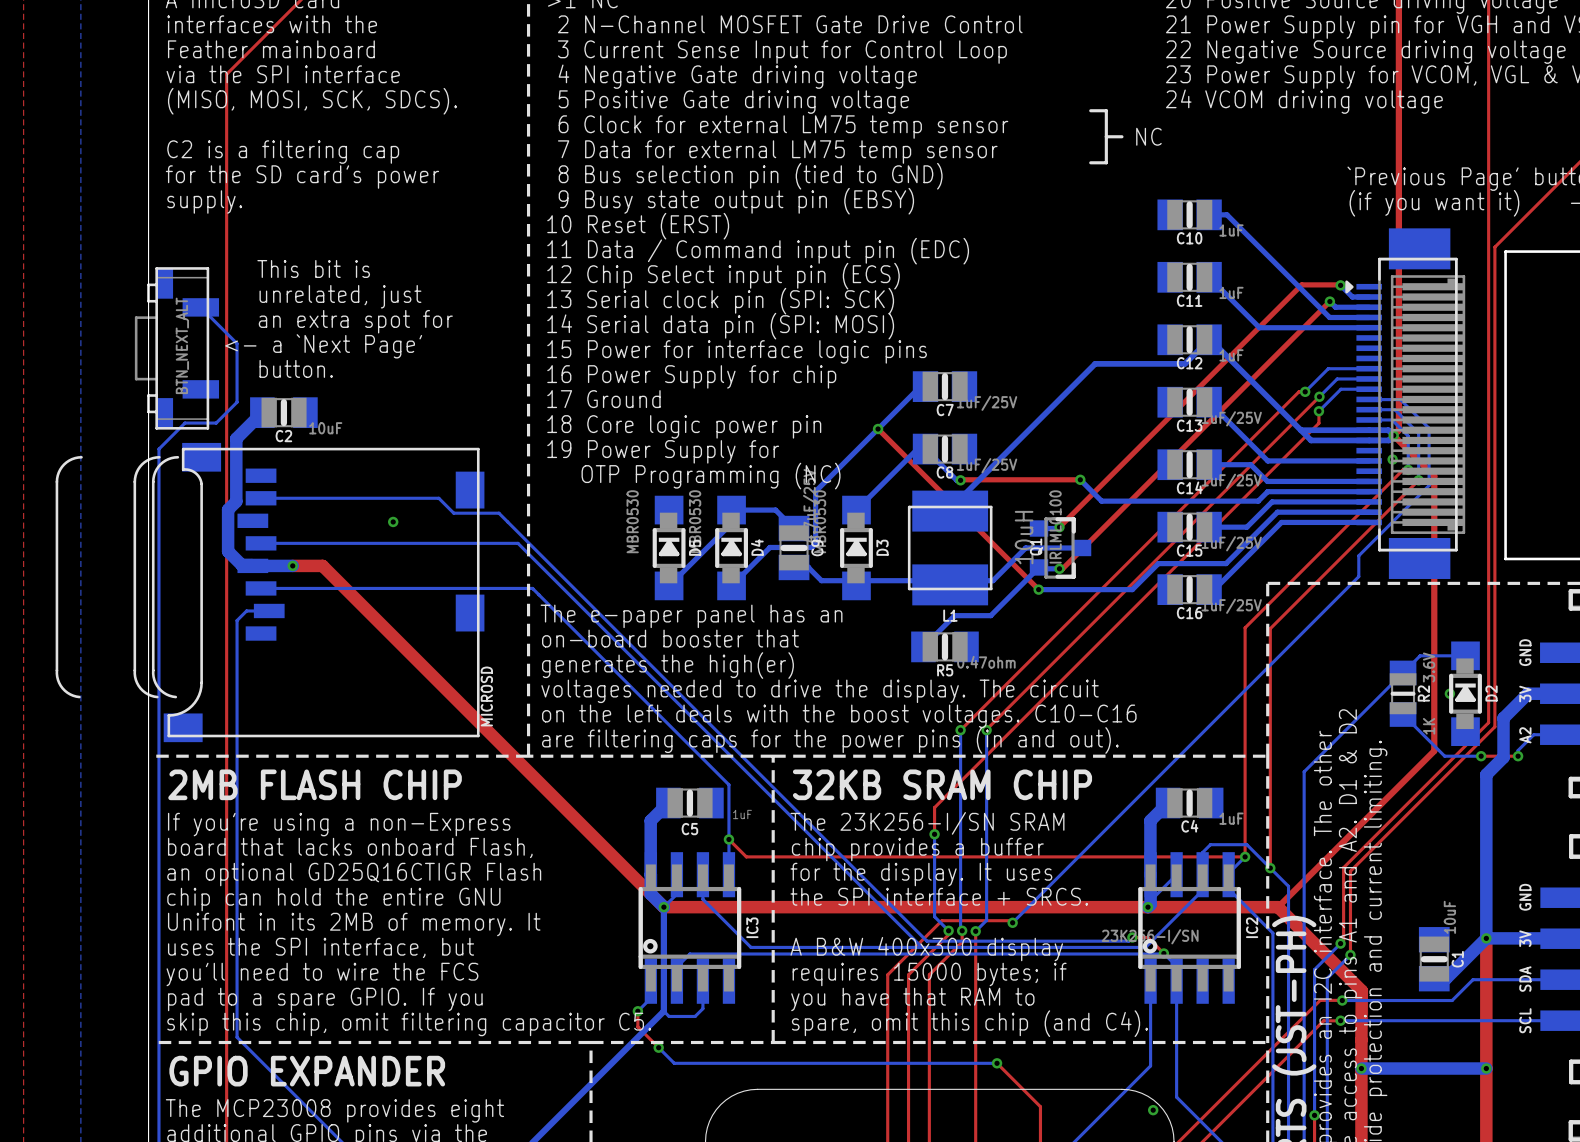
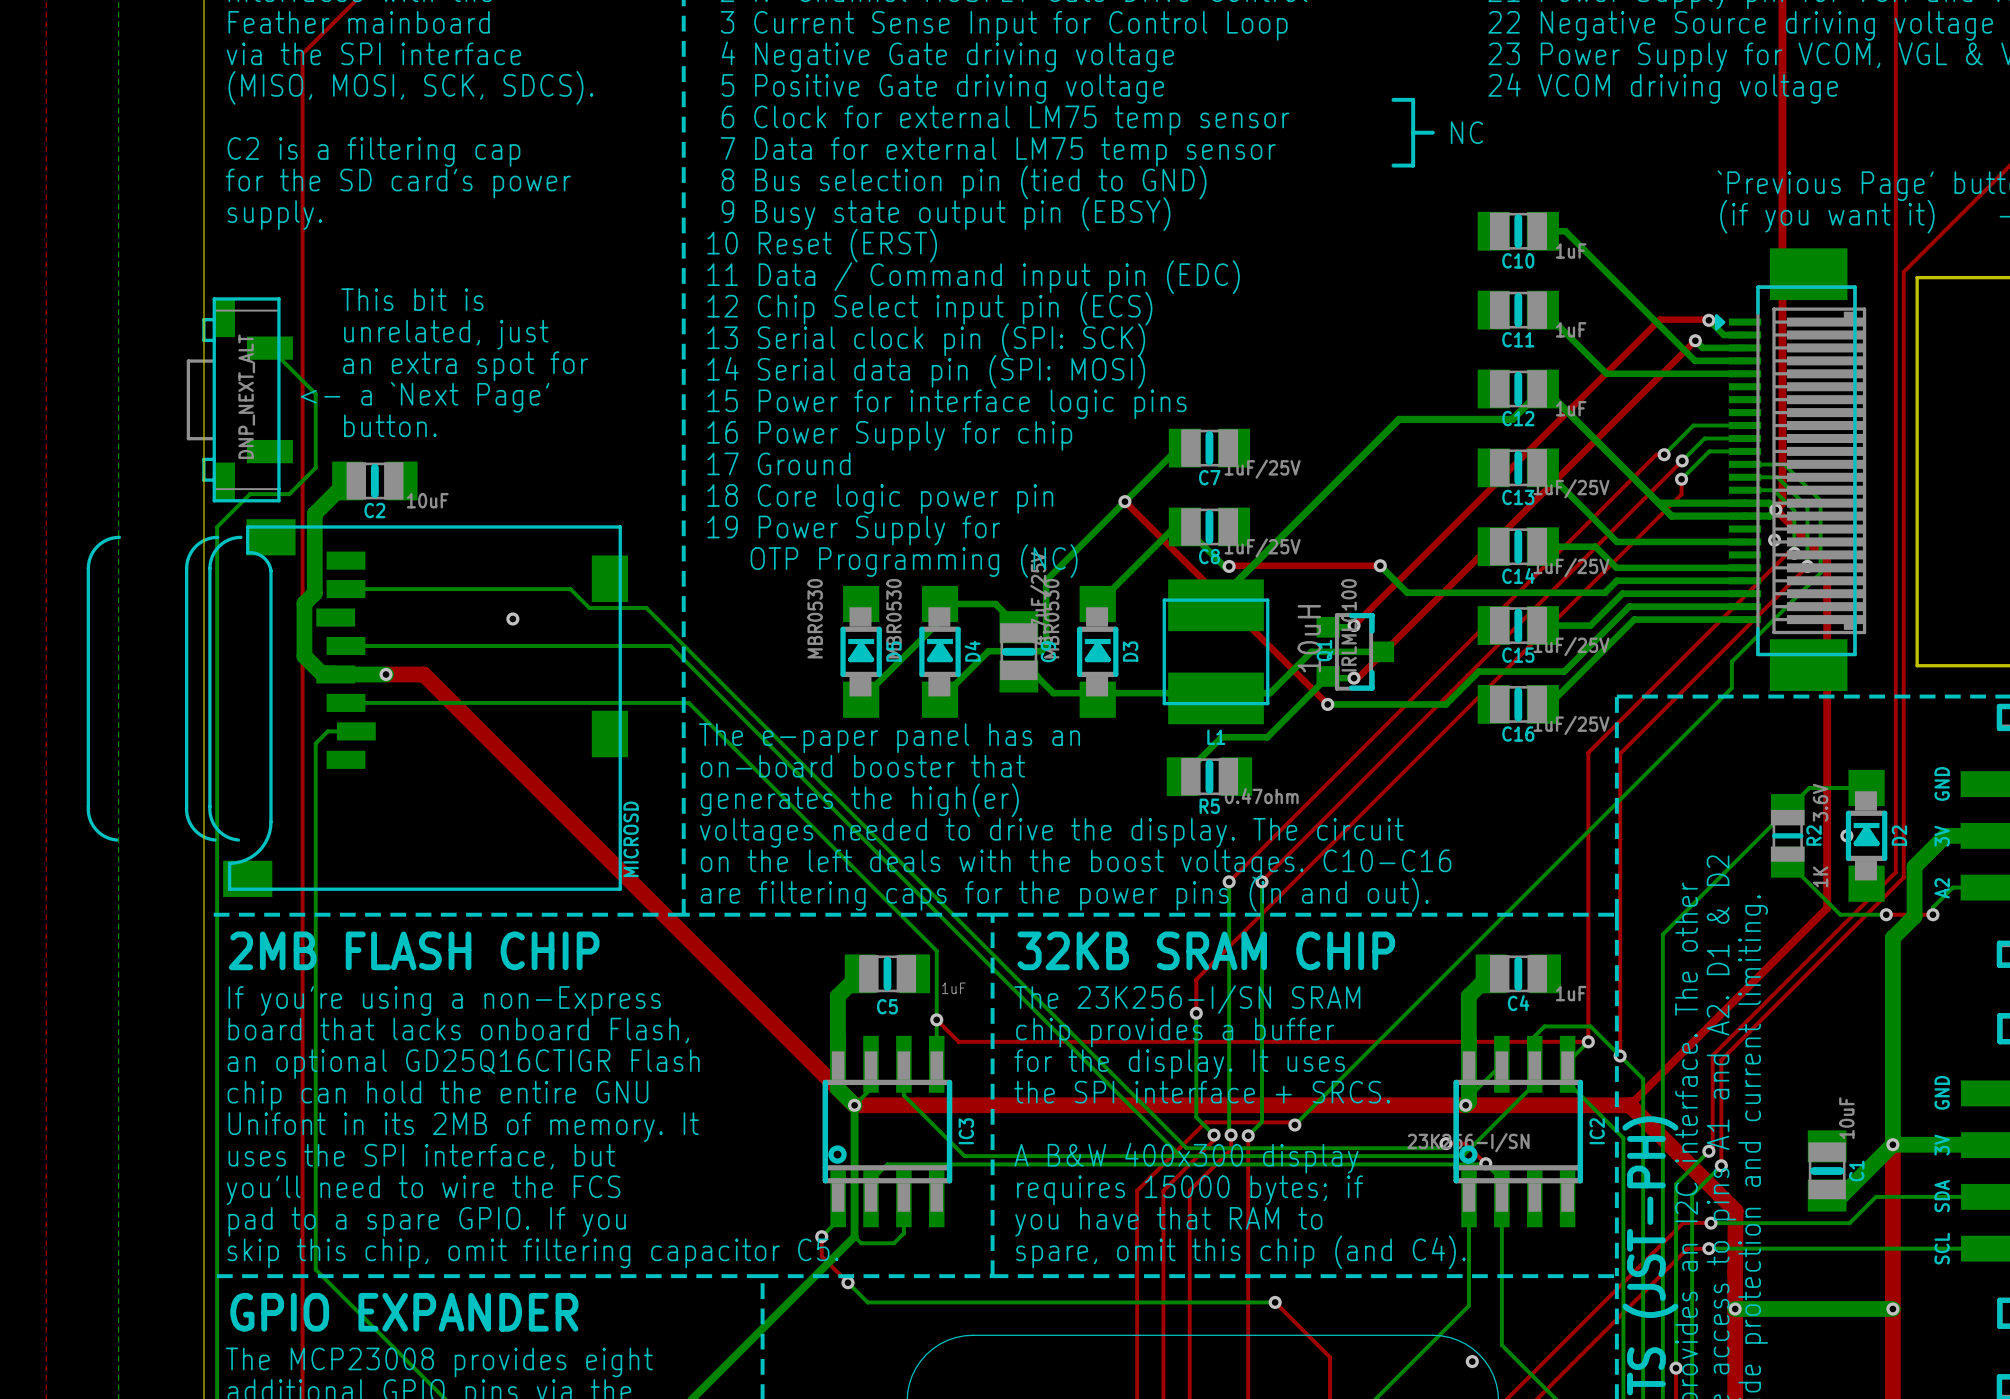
BTN_NEXT_ALT name: BTN_NEXT_ALT (182, 345) -> DNP_NEXT_ALT (246, 396)

